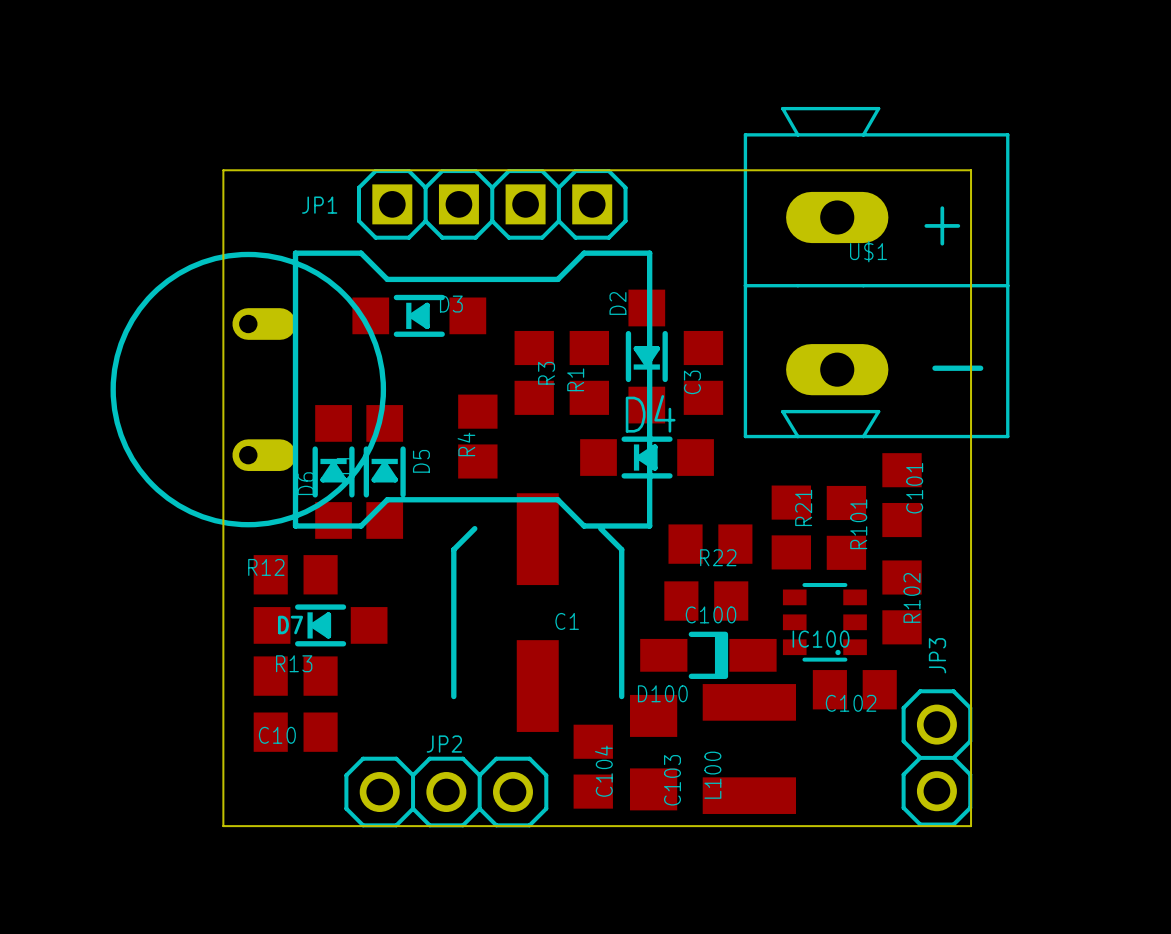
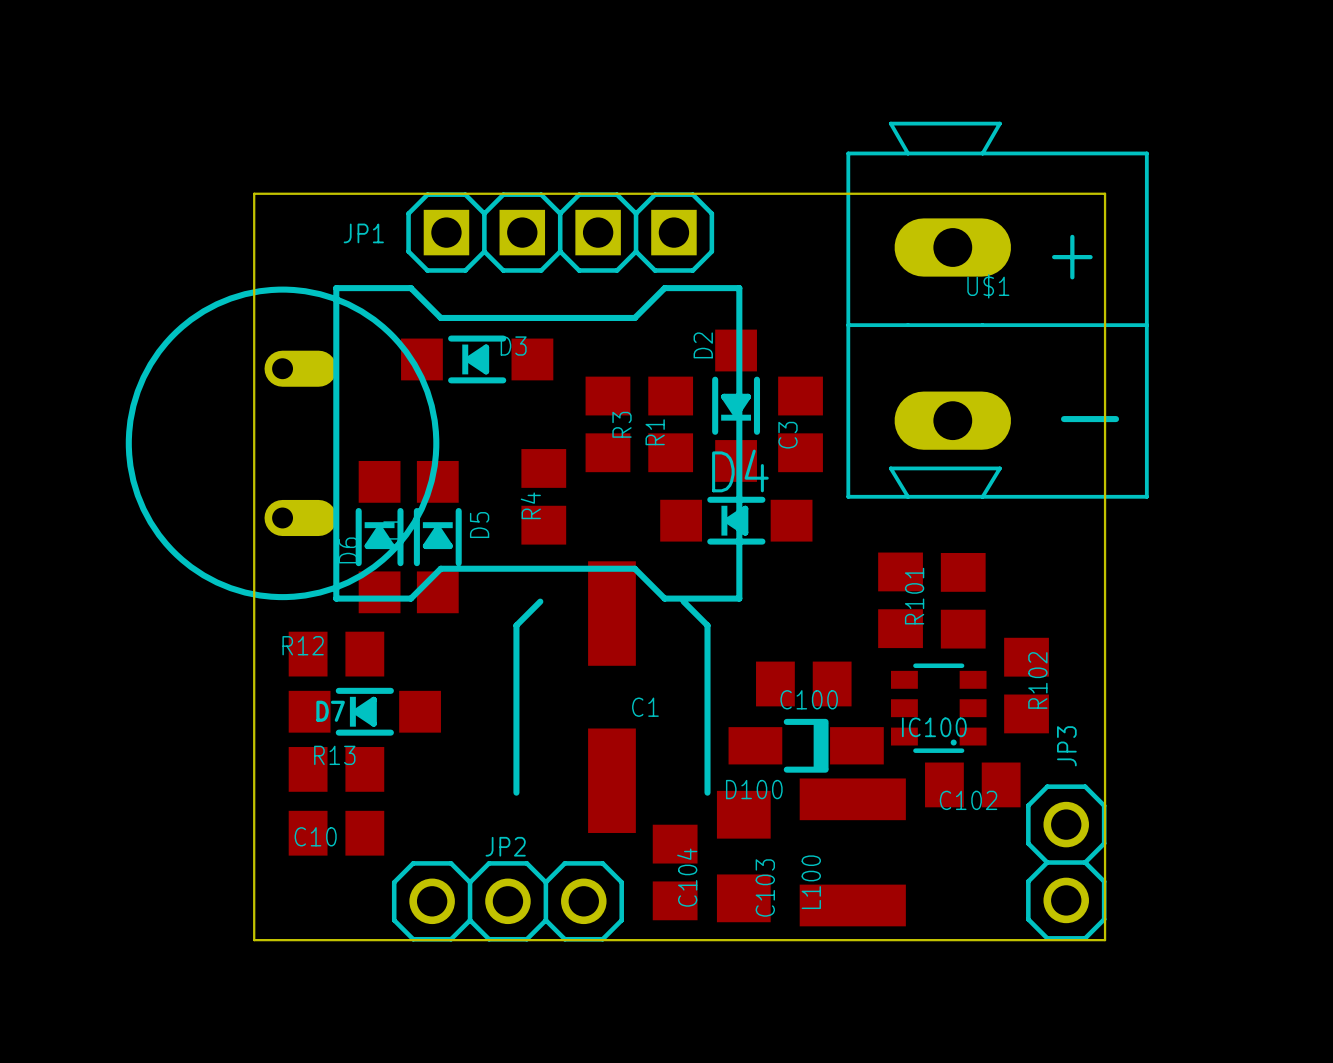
C101: (902, 495) -> none
R21 name: R21 (803, 507) -> R101 (914, 596)
R101 name: R101 (858, 524) -> none
R22: (710, 544) -> none

